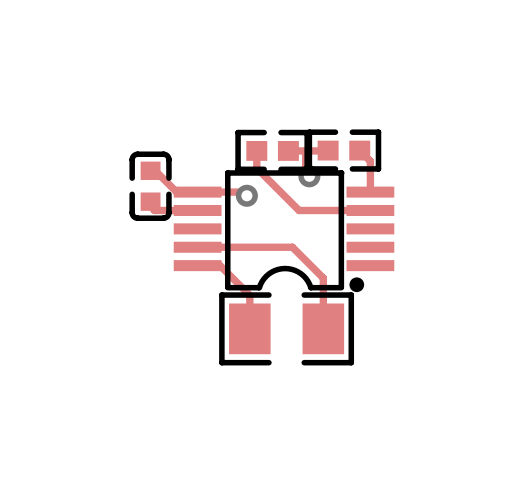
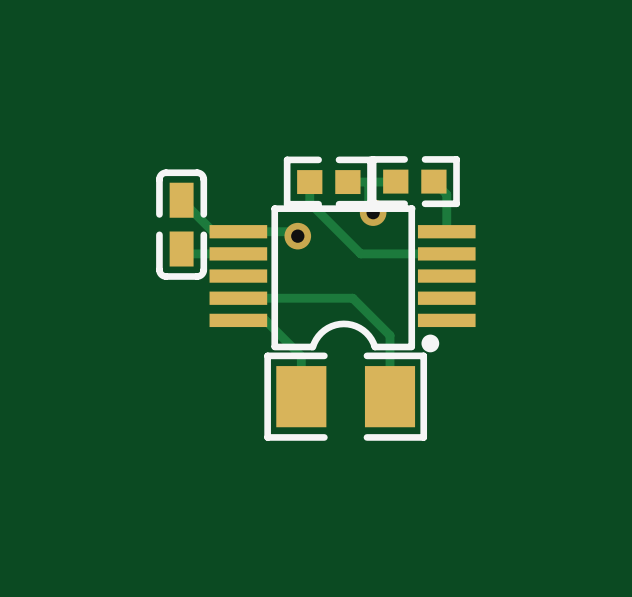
part footprint: [129, 151, 172, 221] -> [156, 169, 208, 280]

